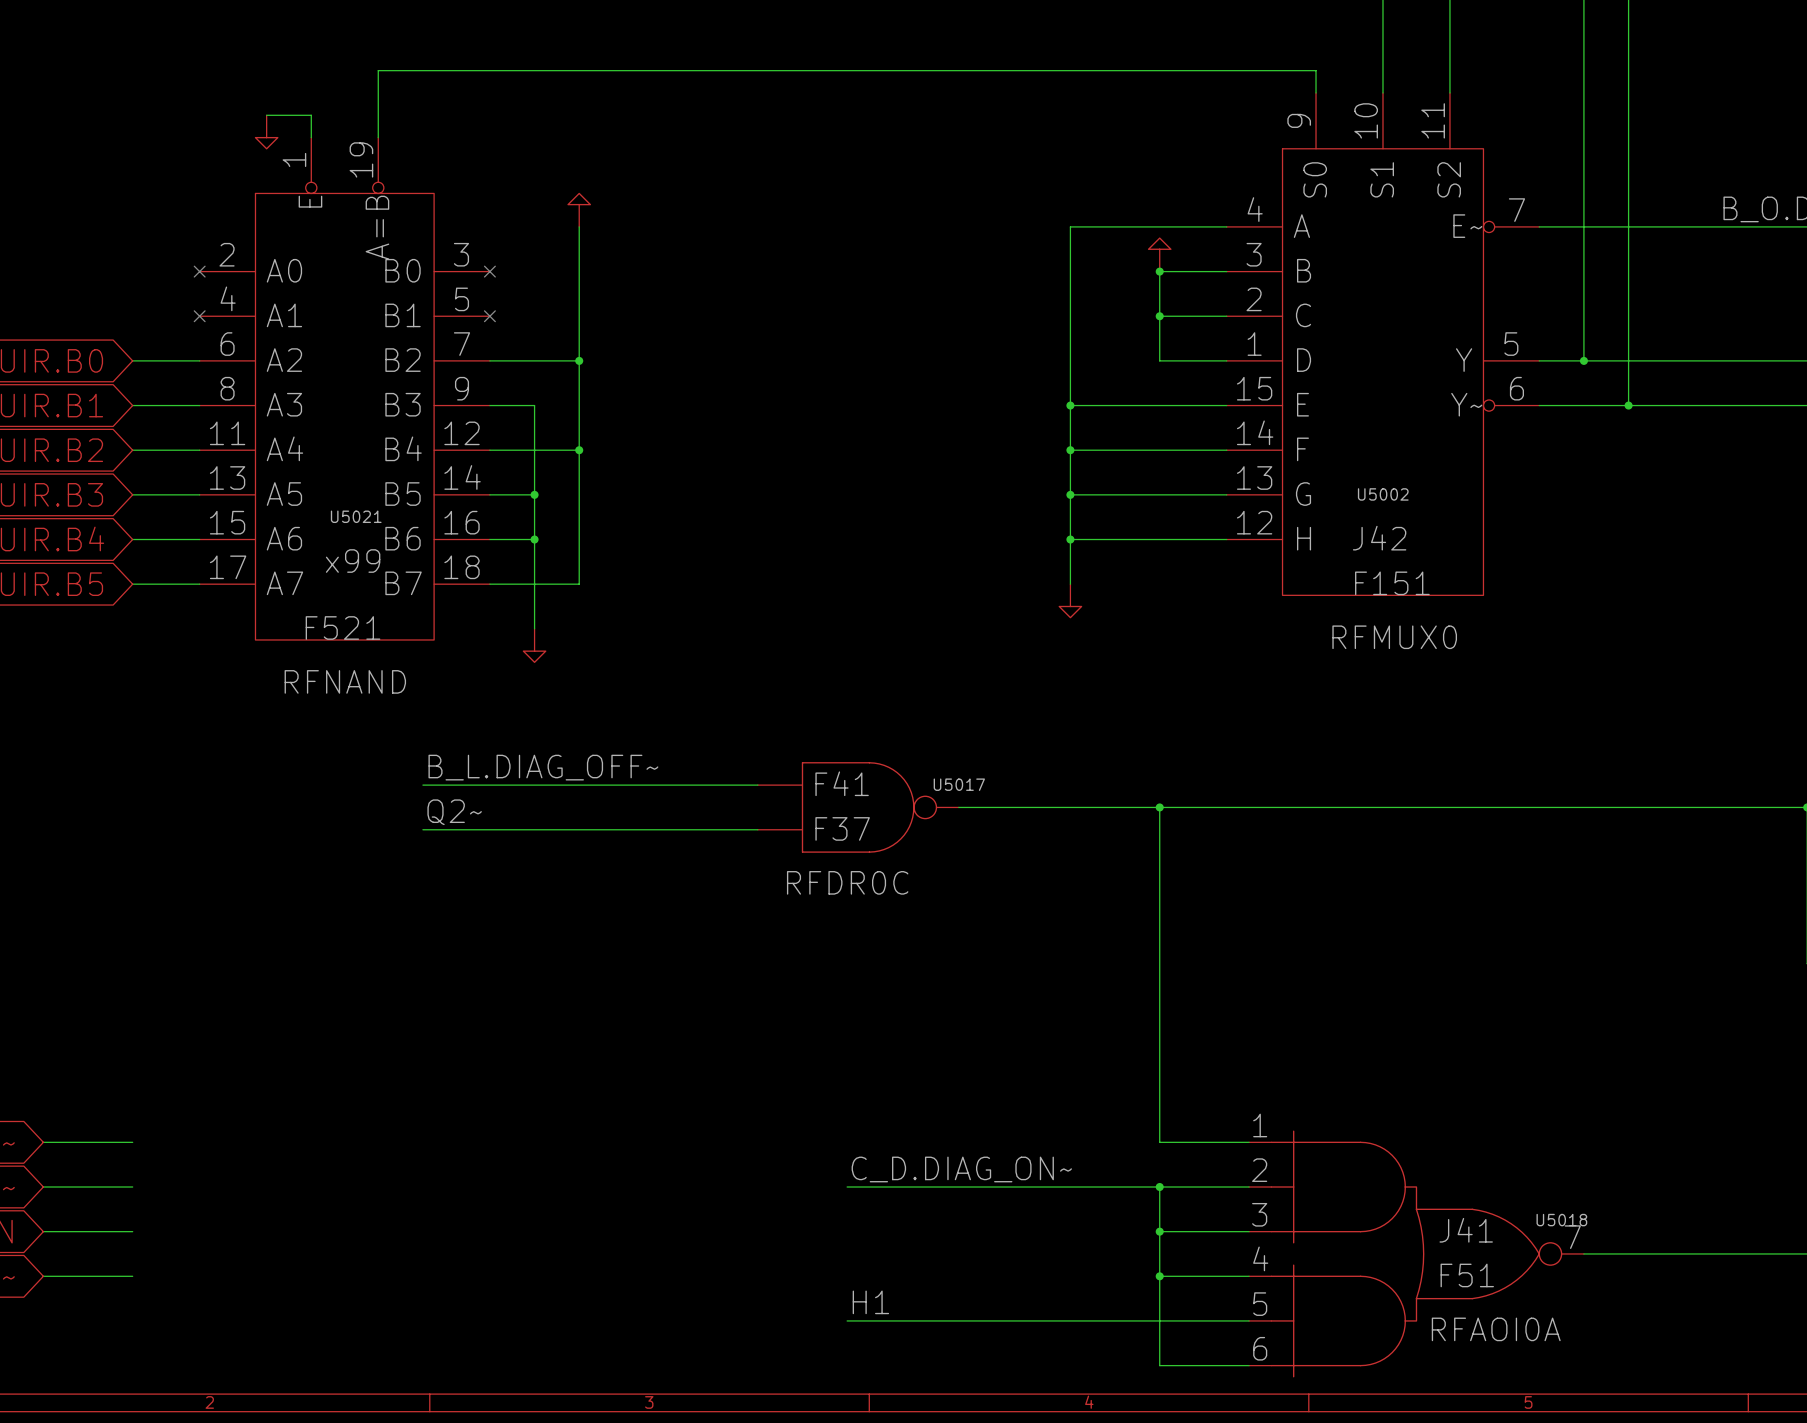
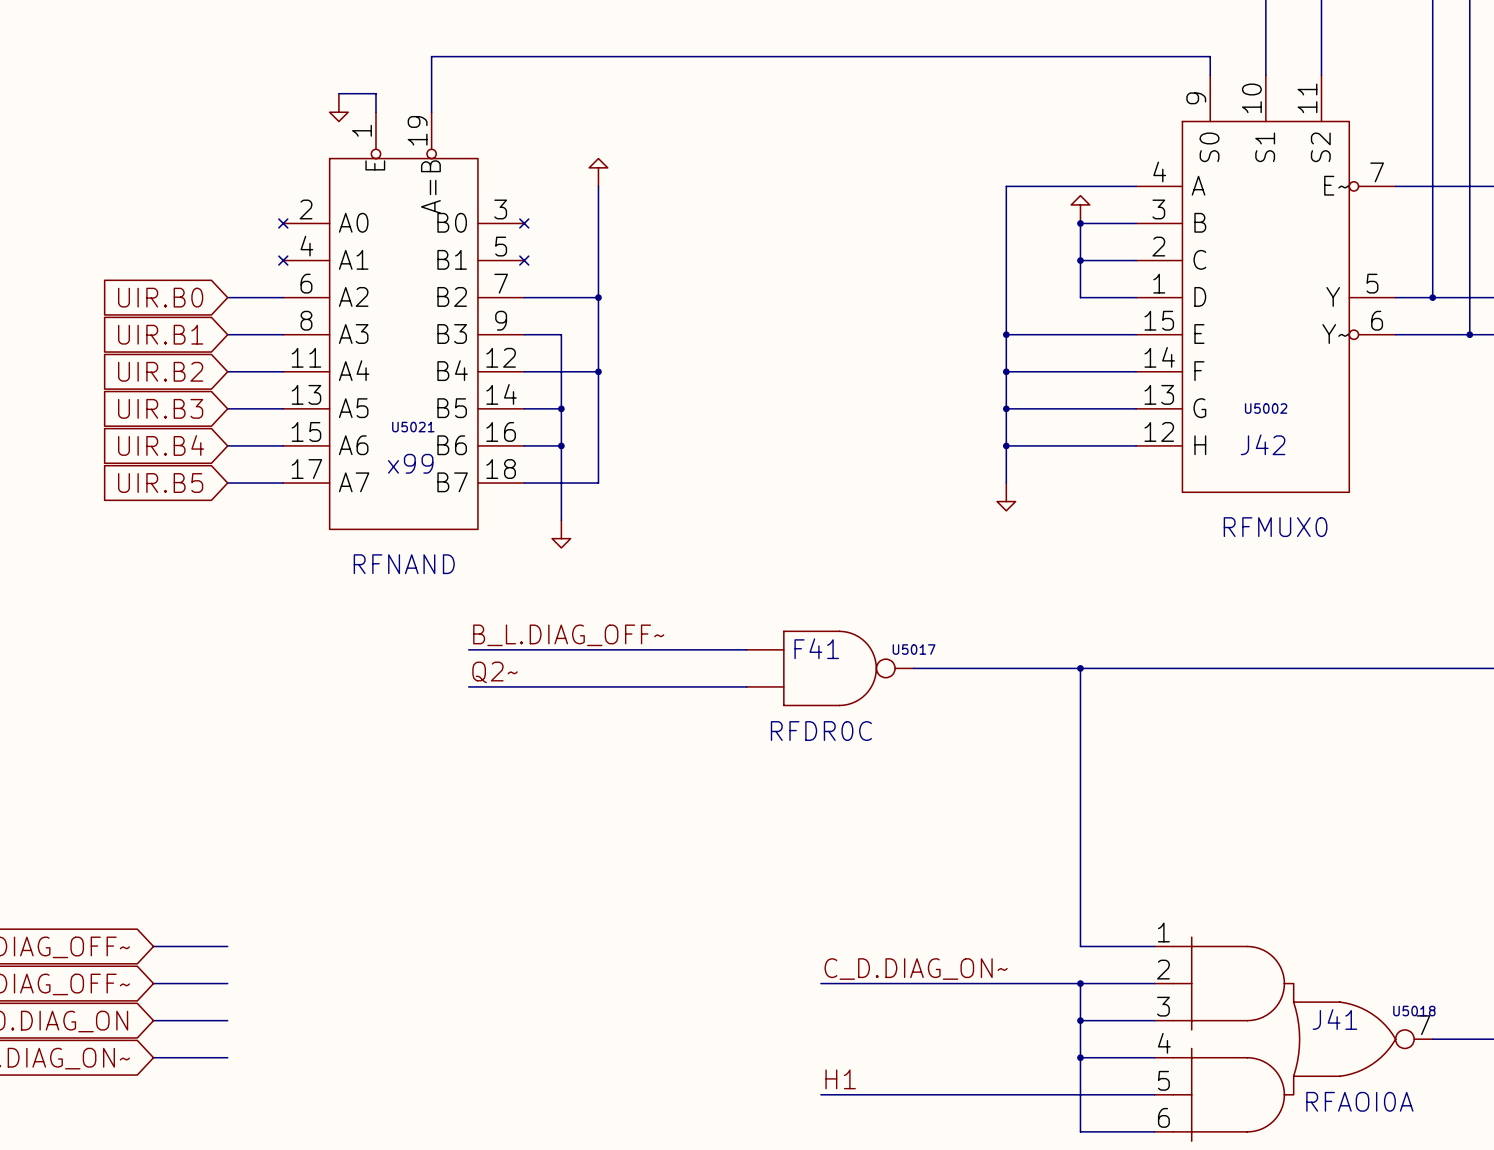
U5002 value: F151 (1392, 583) -> none
U5021 value: F521 (343, 627) -> none
U5017 value: F37 (842, 828) -> none
U5018 value: F51 (1467, 1275) -> none

